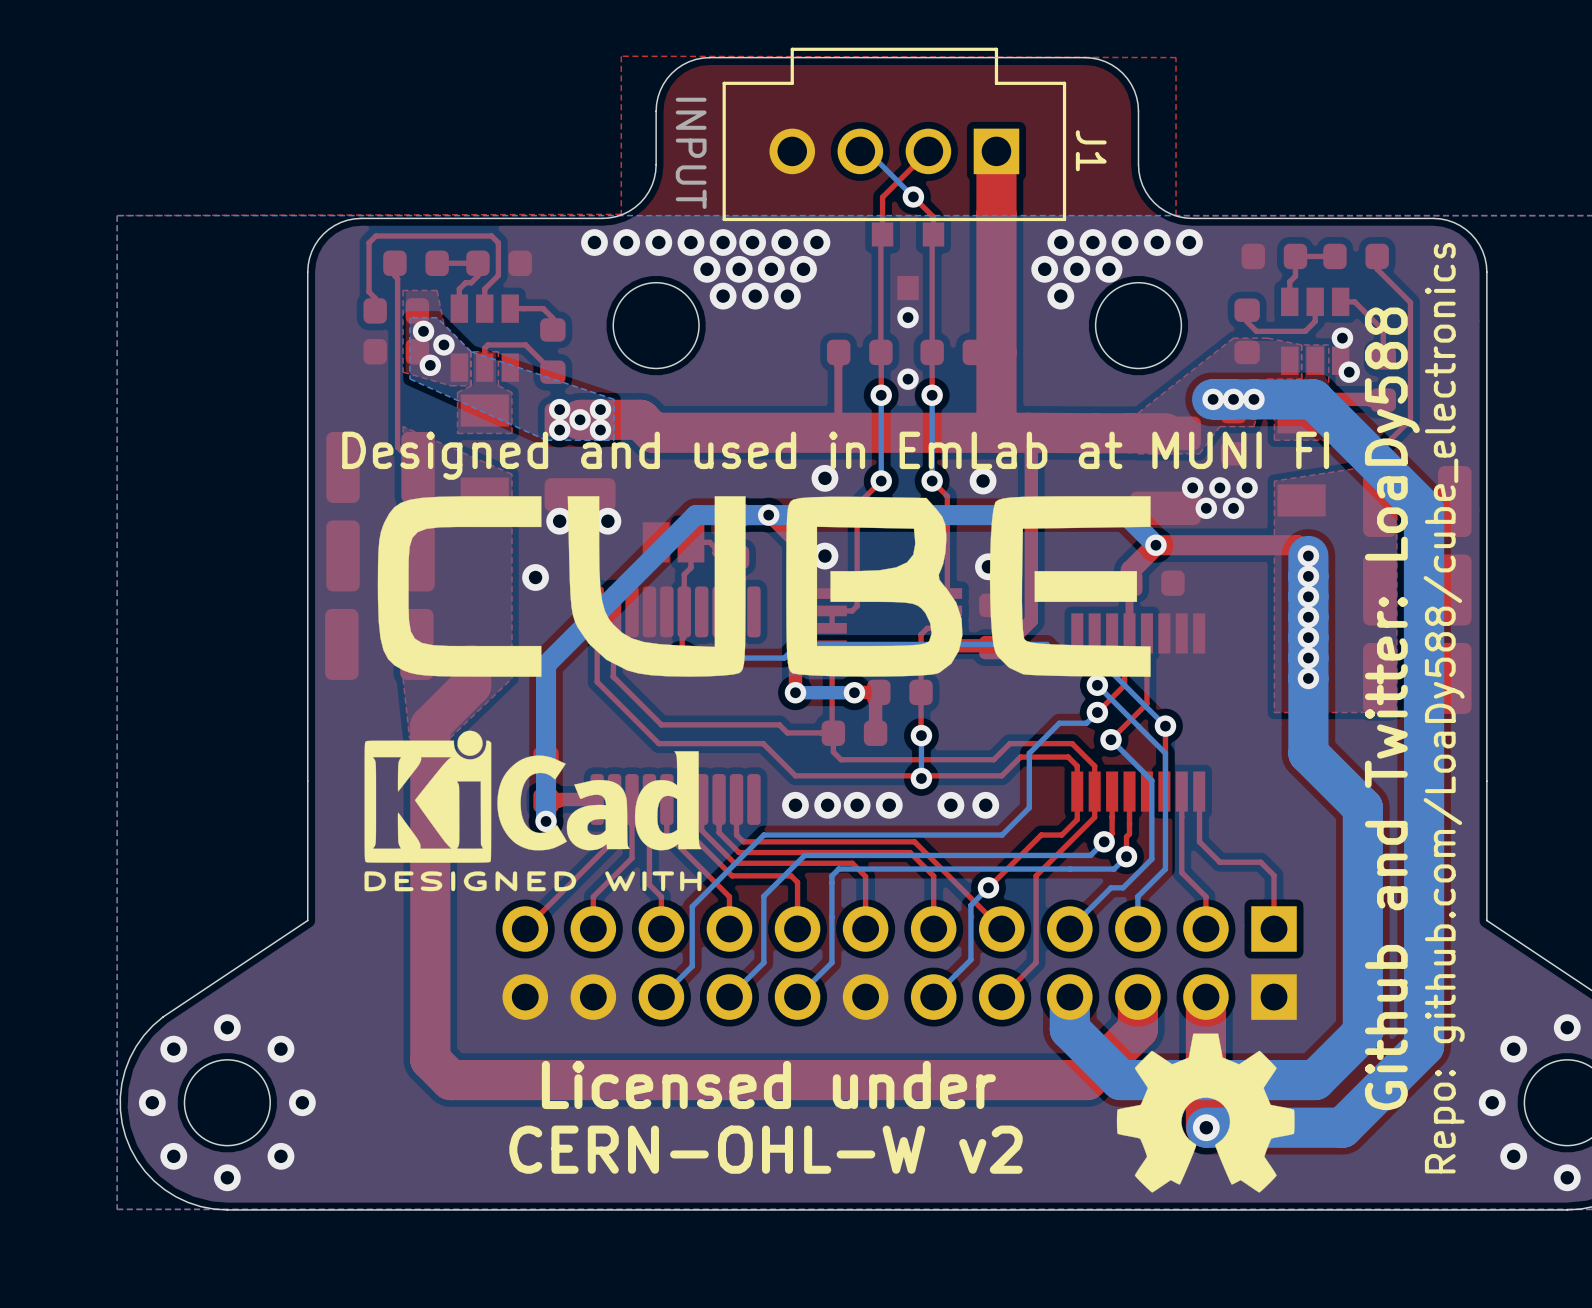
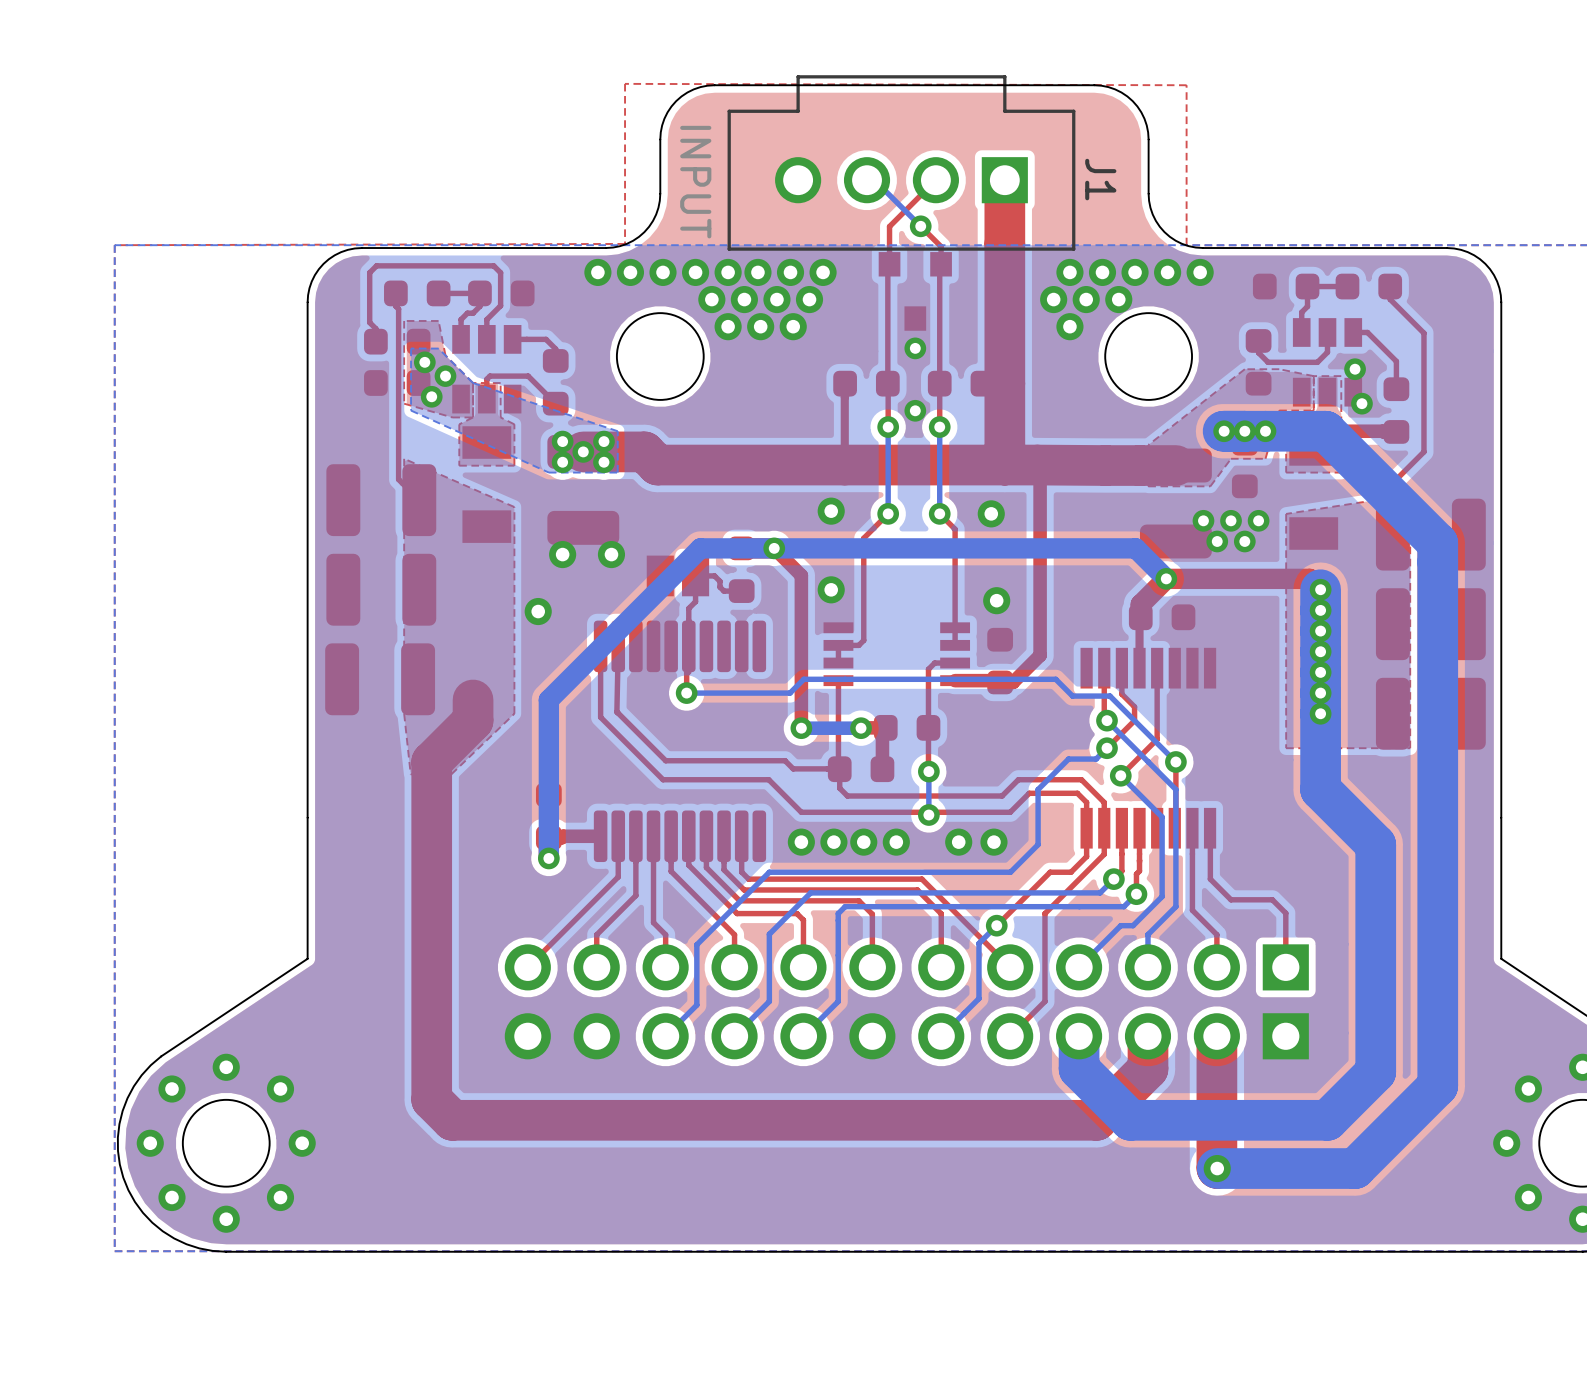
text: Designed and used in EmLab at MUNI FI (835, 455) -> none
drawing: [377, 496, 1151, 677] -> none
text: Github and Twitter: LoaDy588 (1392, 708) -> none
text: Repo: github.com/LoaDy588/cube_electronics (1444, 708) -> none
drawing: [364, 730, 702, 892] -> none
drawing: [1116, 1033, 1295, 1193] -> none
text: Licensed under (768, 1084) -> none
text: CERN-OHL-W v2 (766, 1149) -> none

